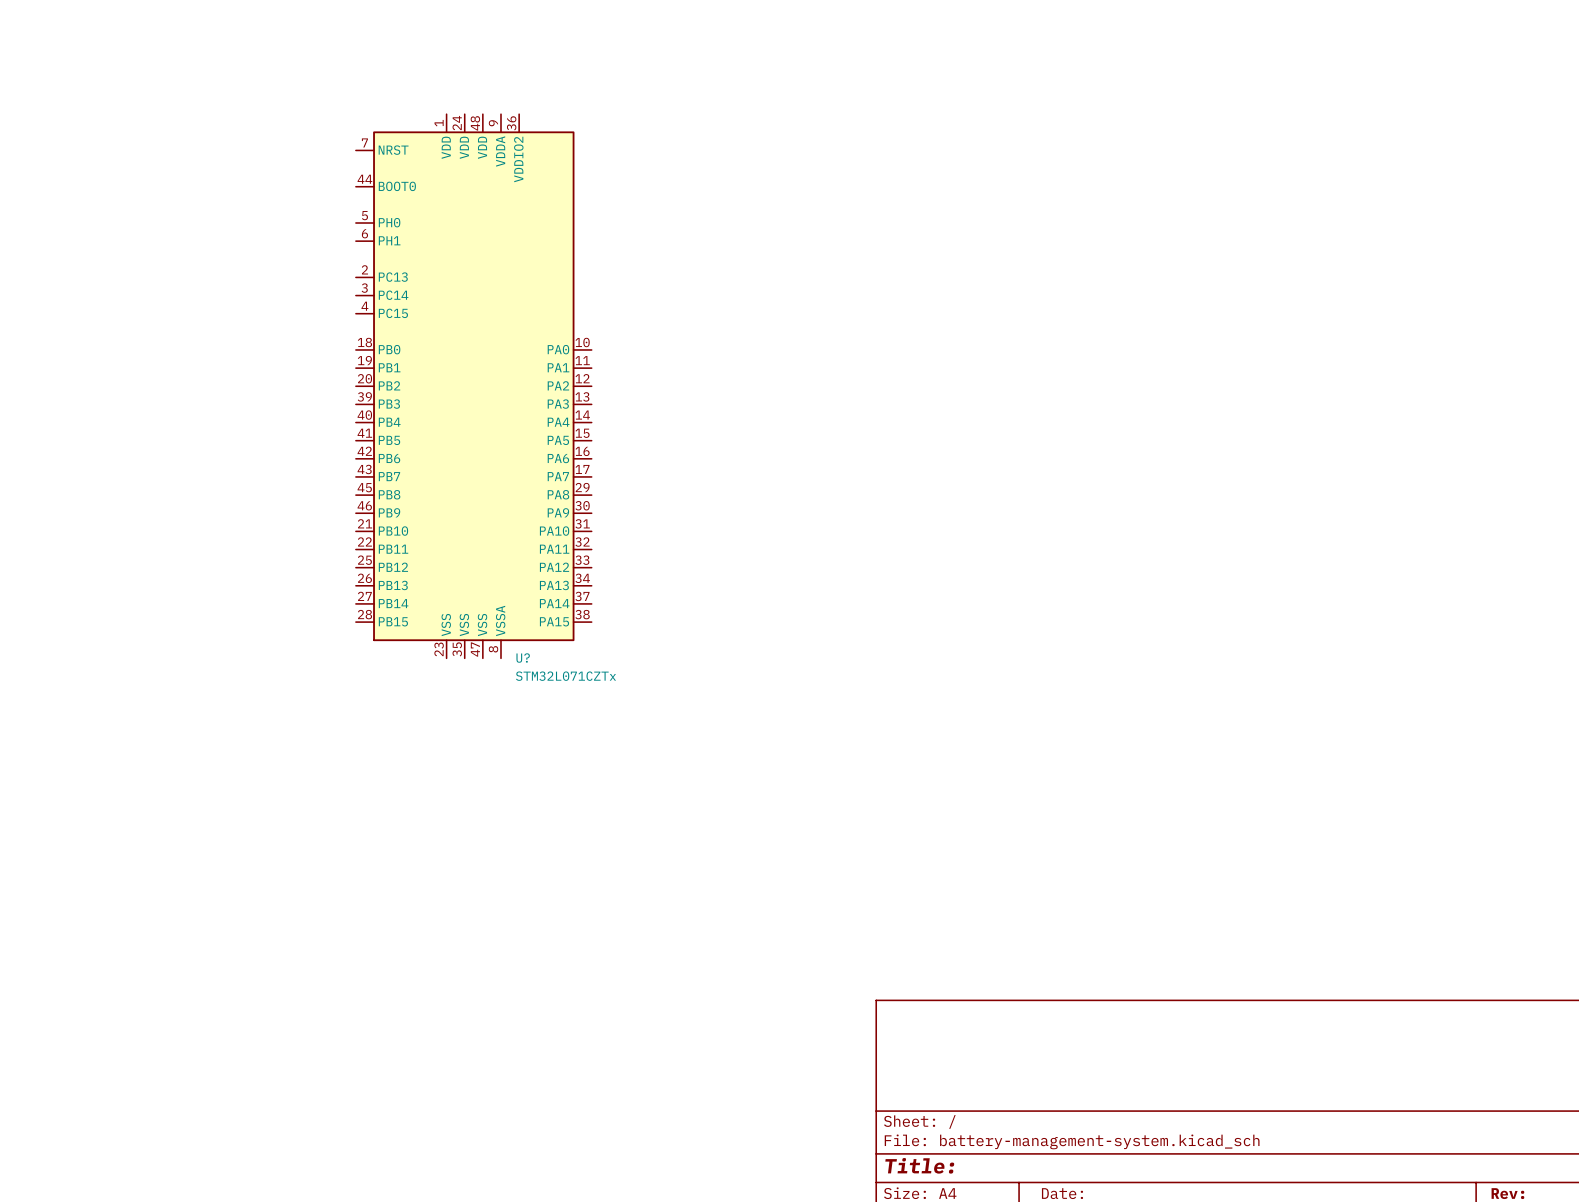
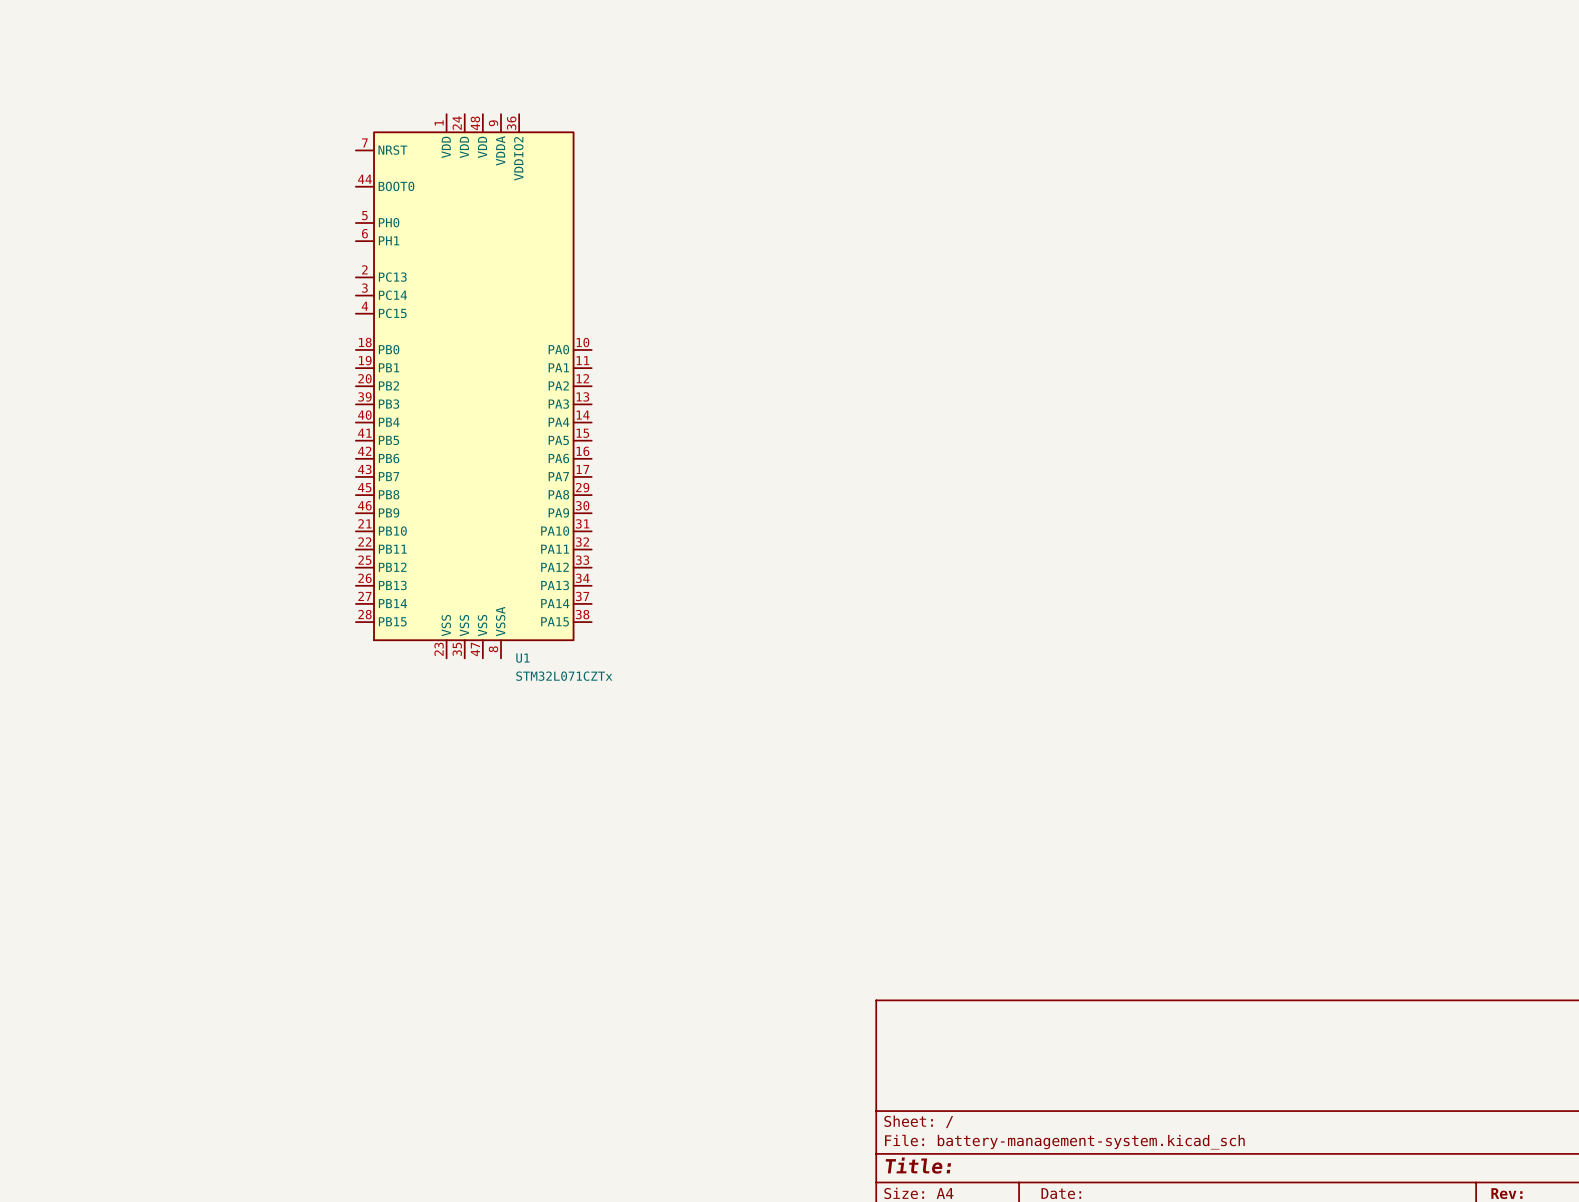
U? name: U? (523, 658) -> U1 (522, 658)

